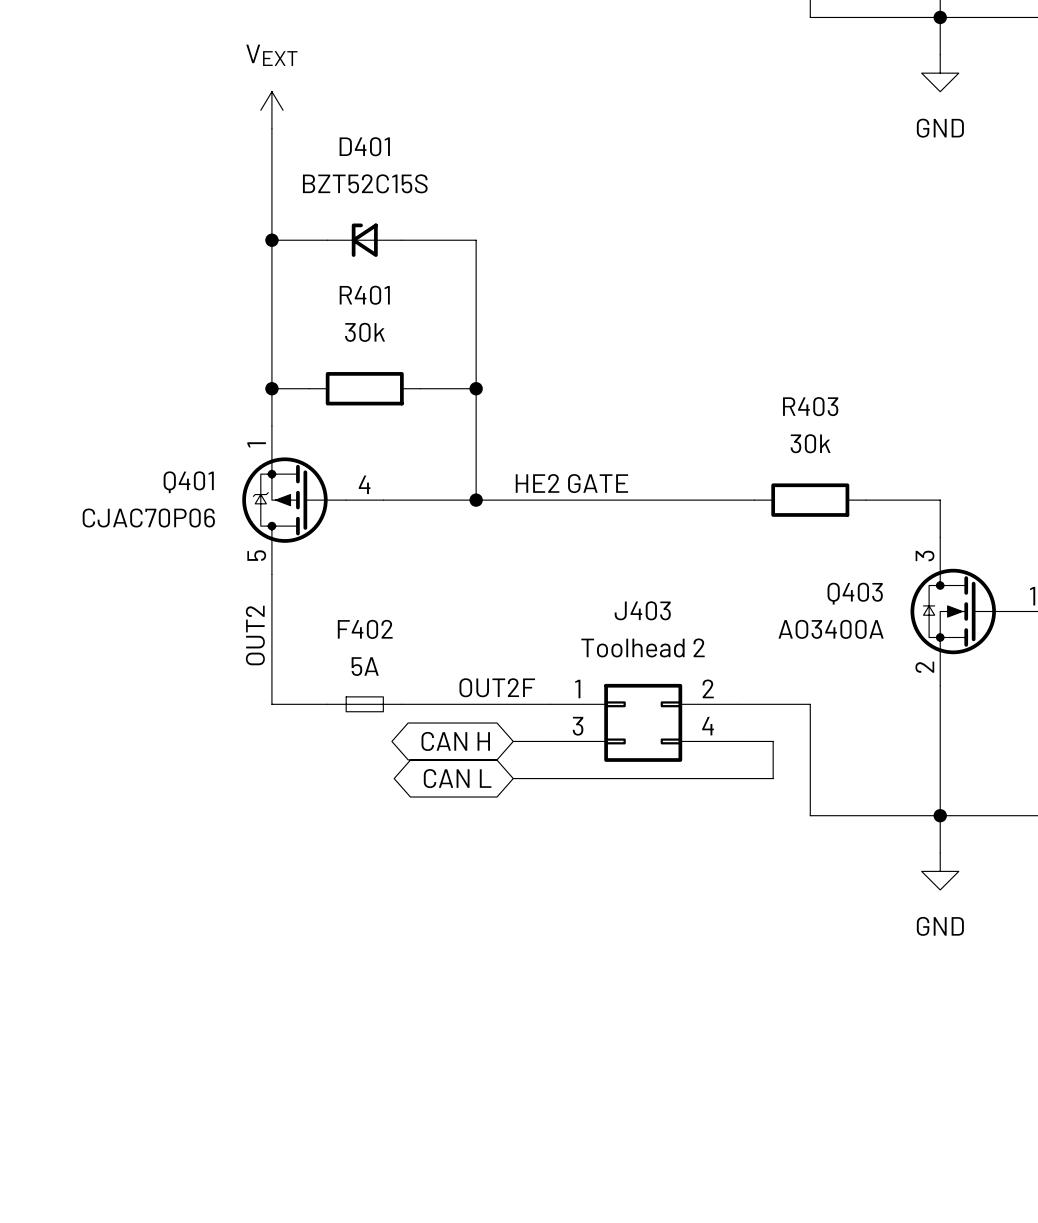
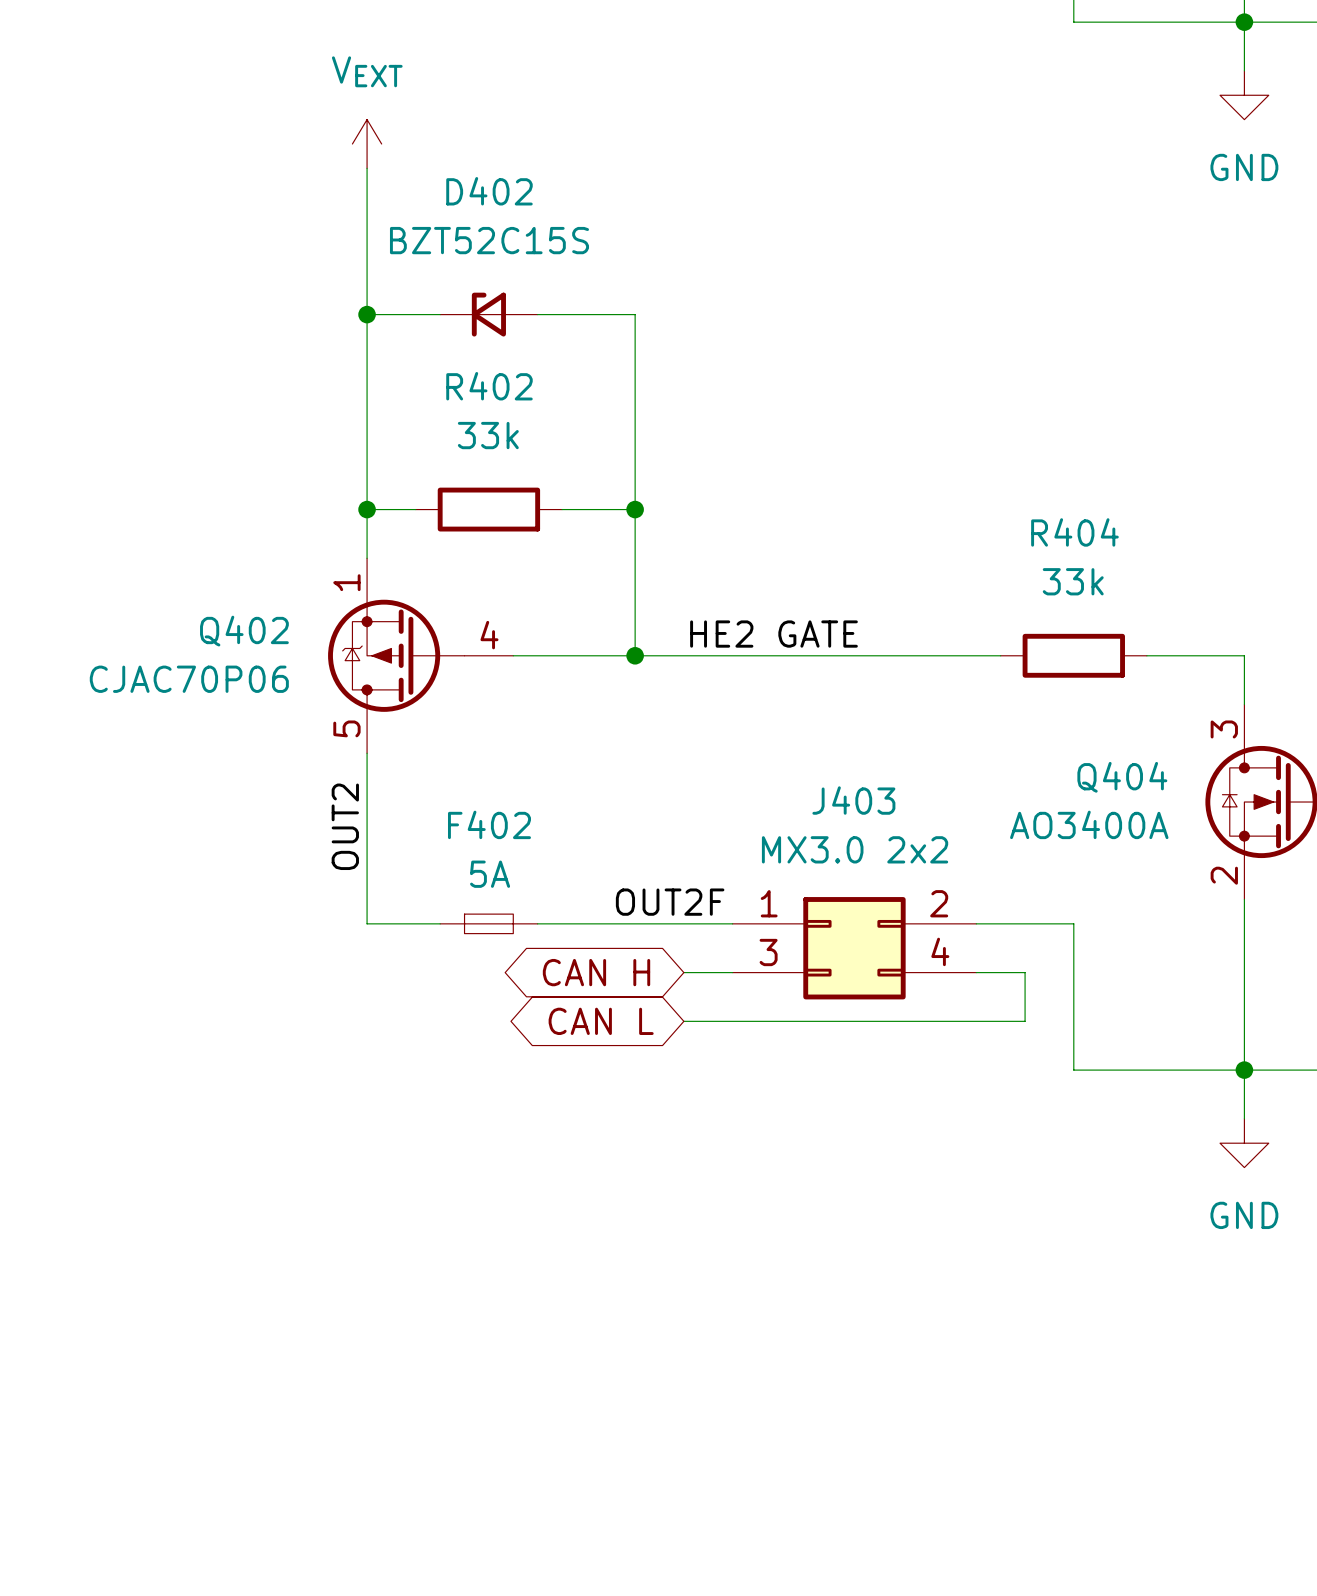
D401 name: D401 (364, 146) -> D402 (489, 191)
R401 name: R401 (364, 295) -> R402 (489, 386)
R401 value: 30k (365, 332) -> 33k (488, 435)
R403 name: R403 (810, 406) -> R404 (1074, 532)
R403 value: 30k (810, 443) -> 33k (1073, 581)
Q401 name: Q401 (188, 482) -> Q402 (244, 631)
Q403 name: Q403 (855, 593) -> Q404 (1122, 777)
J403 value: Toolhead 2 (643, 647) -> MX3.0 2x2 (855, 849)

